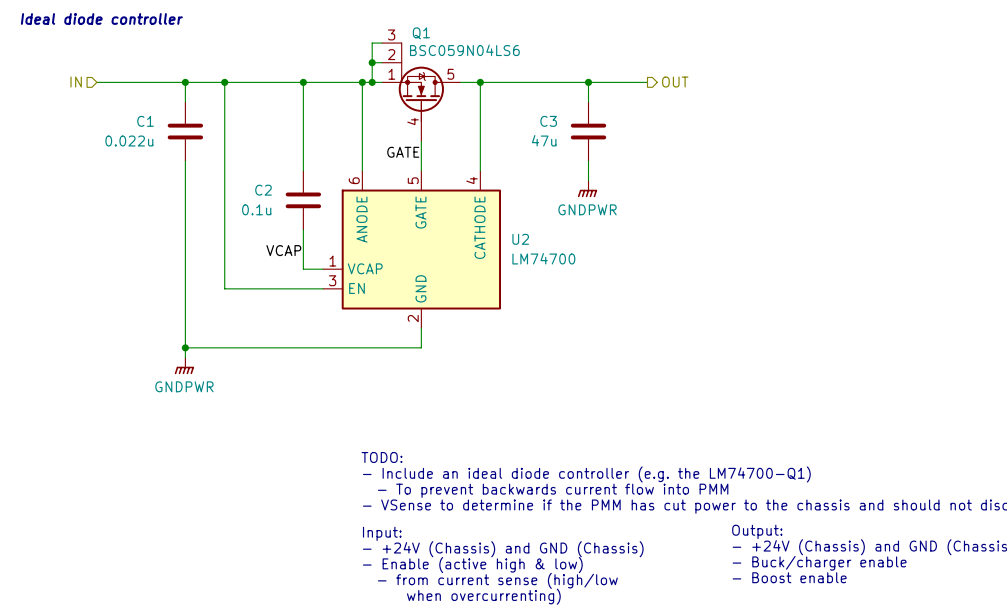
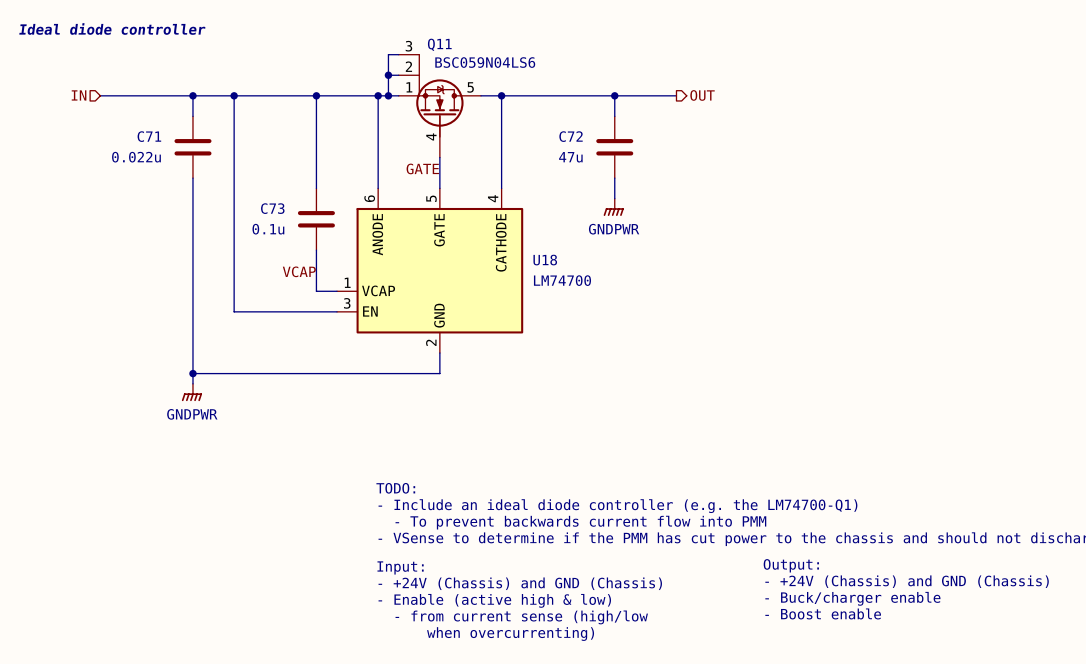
Q1 name: Q1 (421, 33) -> Q11 (439, 44)
C1 name: C1 (145, 121) -> C71 (149, 136)
C3 name: C3 (548, 121) -> C72 (571, 136)
C2 name: C2 (263, 190) -> C73 (272, 208)
U2 name: U2 (520, 239) -> U18 (545, 260)

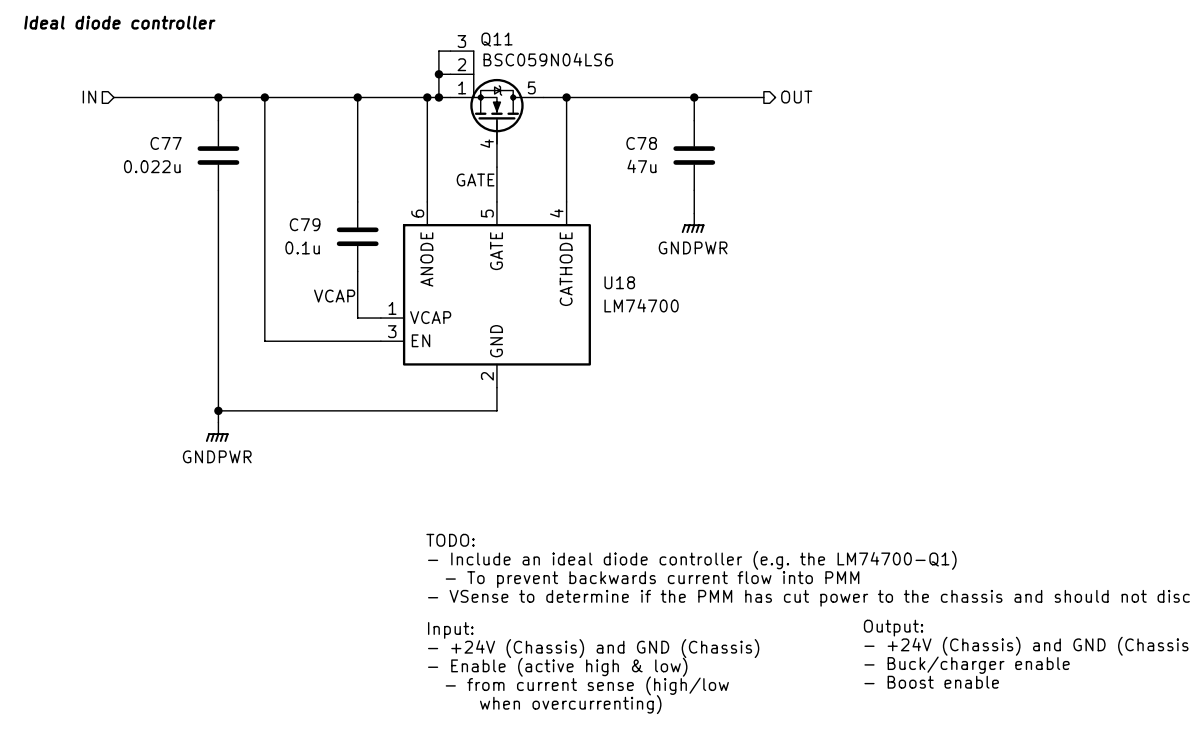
C71 name: C71 (149, 136) -> C77 (166, 143)
C72 name: C72 (571, 136) -> C78 (641, 143)
C73 name: C73 (272, 208) -> C79 (305, 224)

